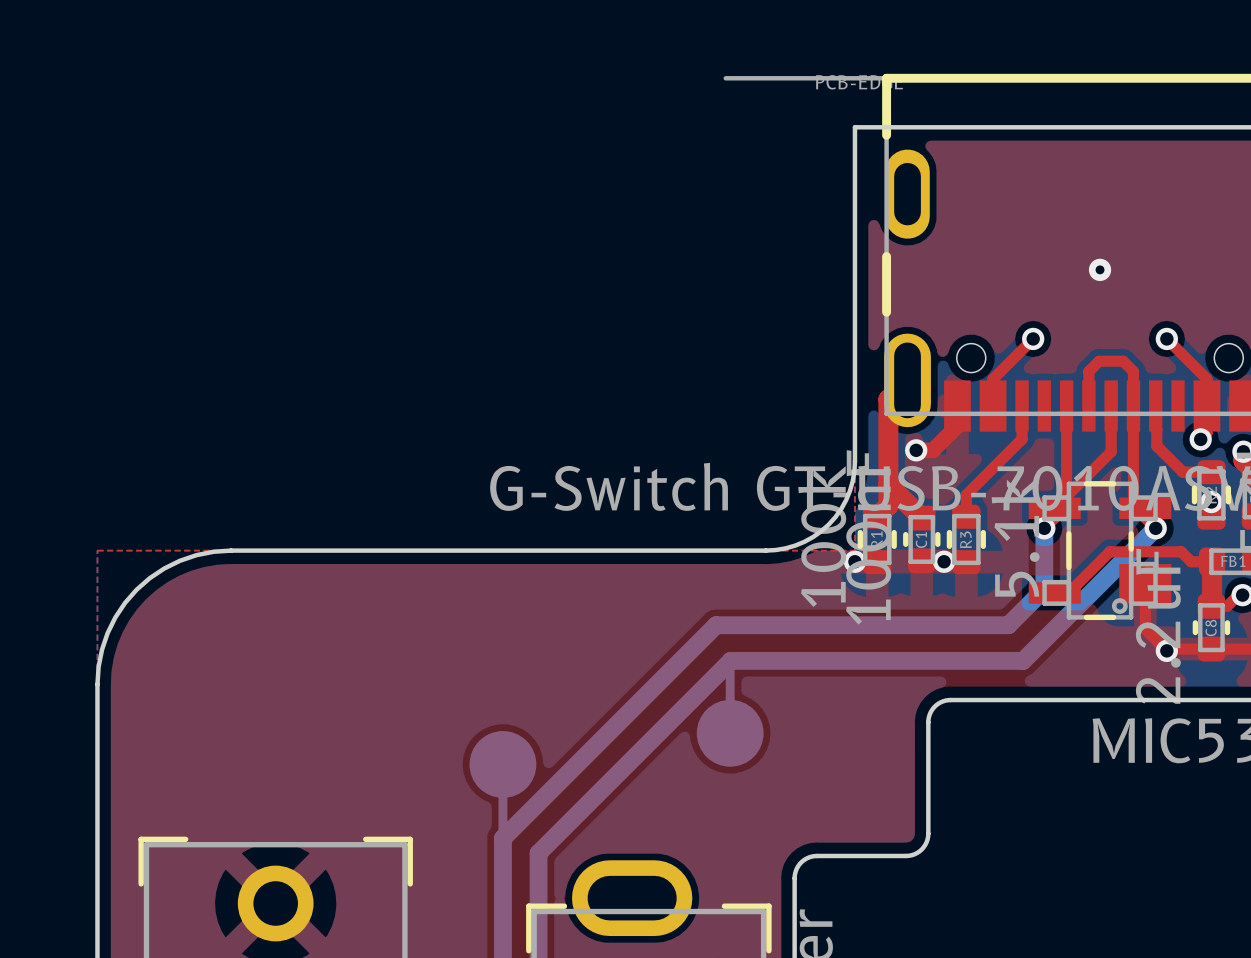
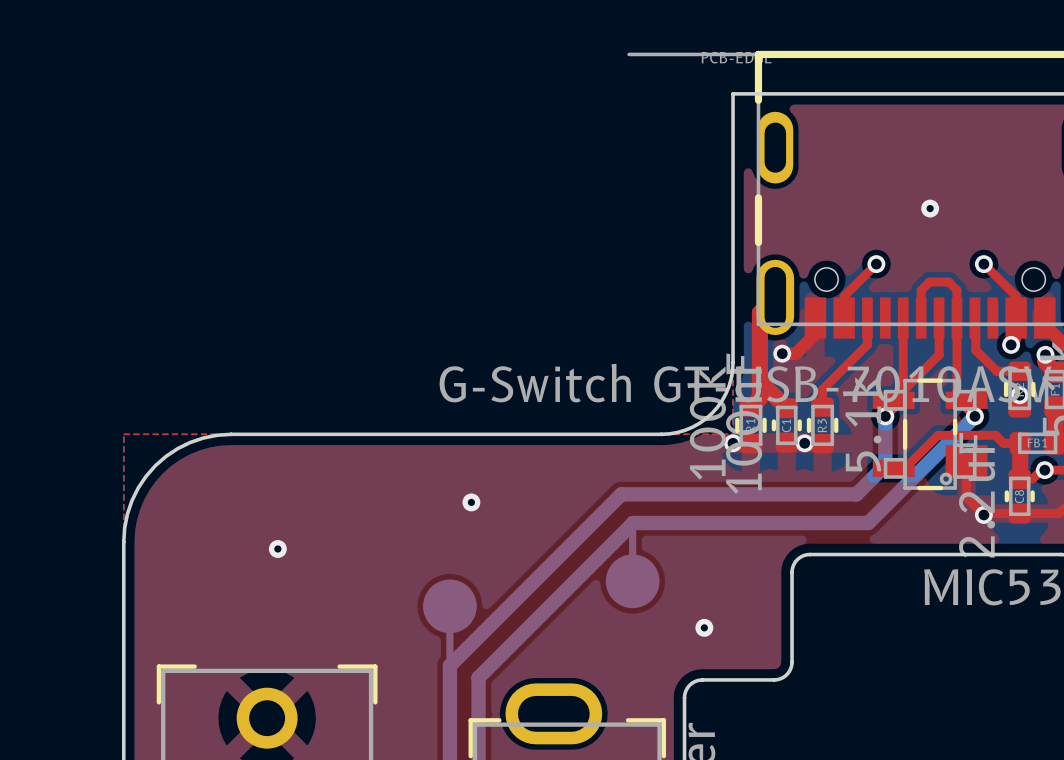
via: none -> (471, 502)
via: none -> (277, 549)
via: none -> (704, 627)

